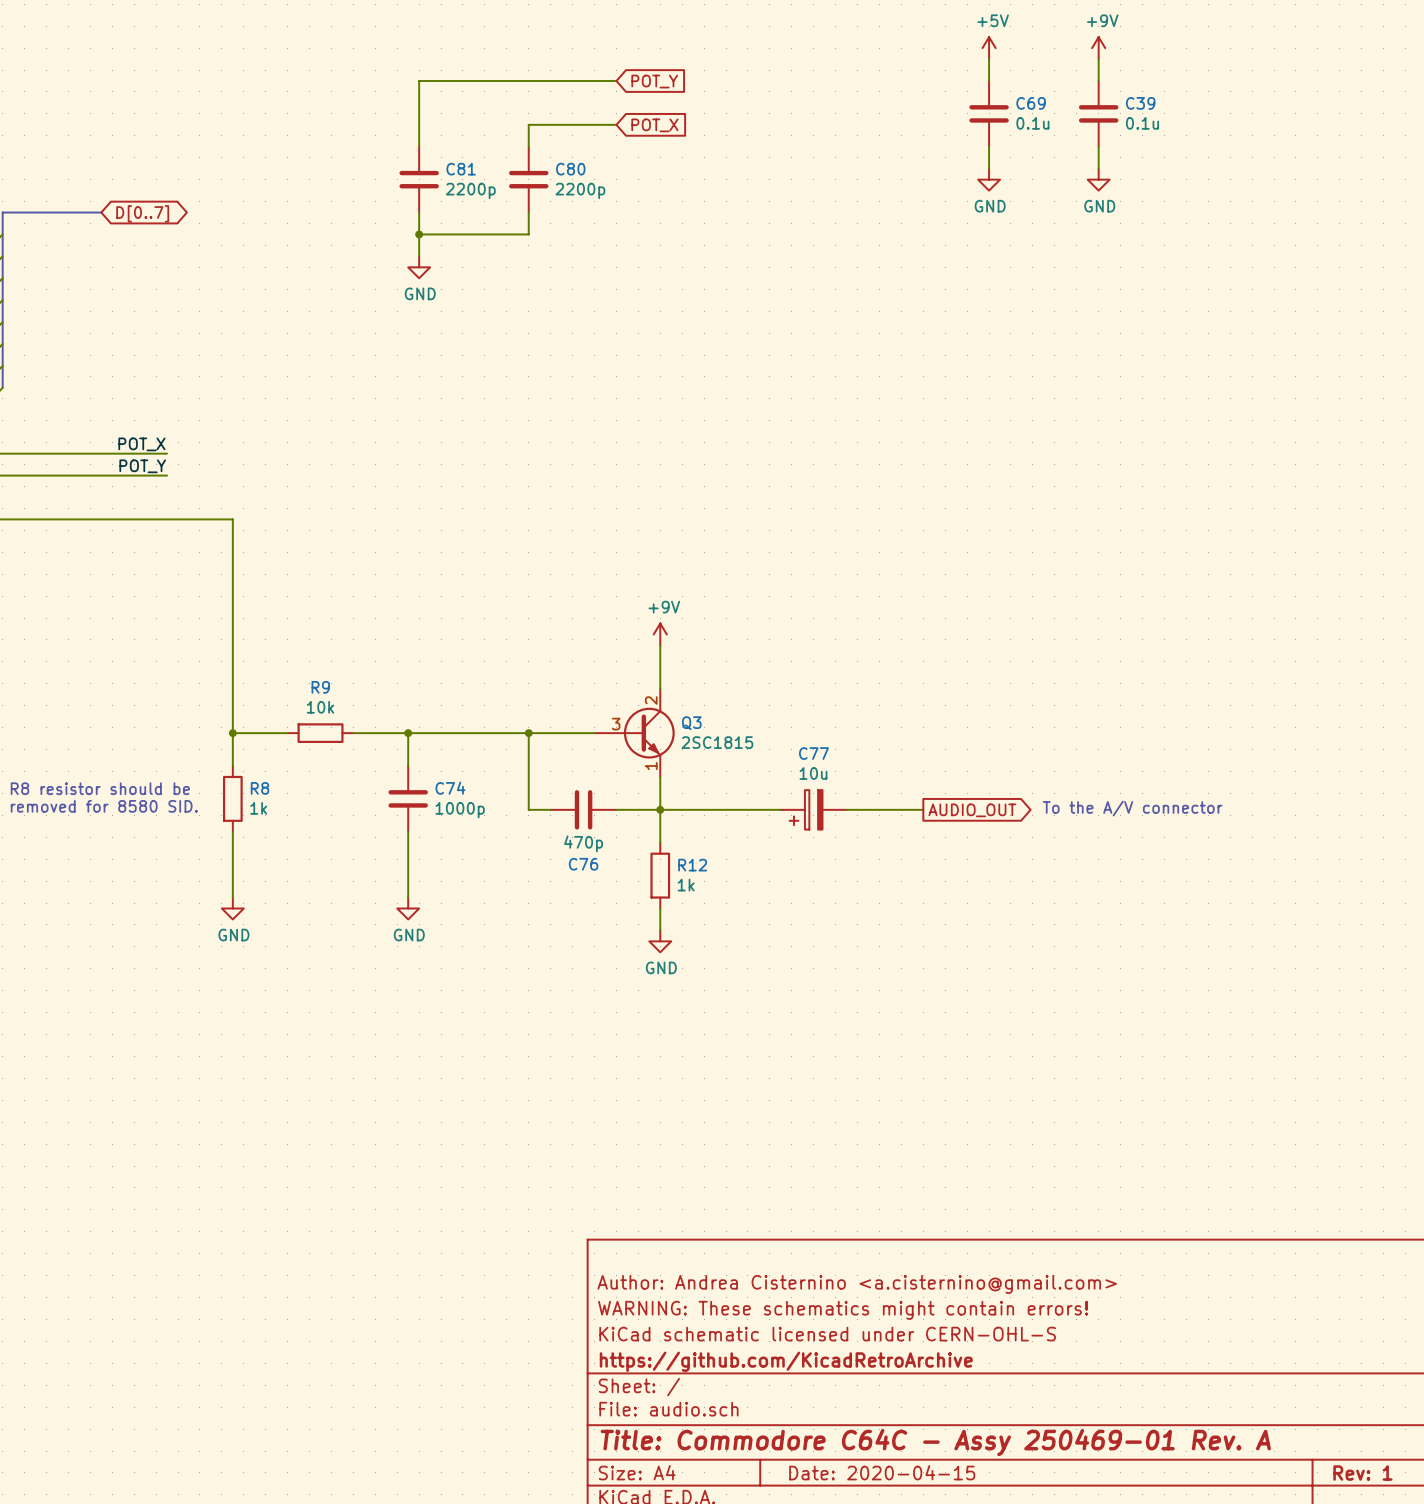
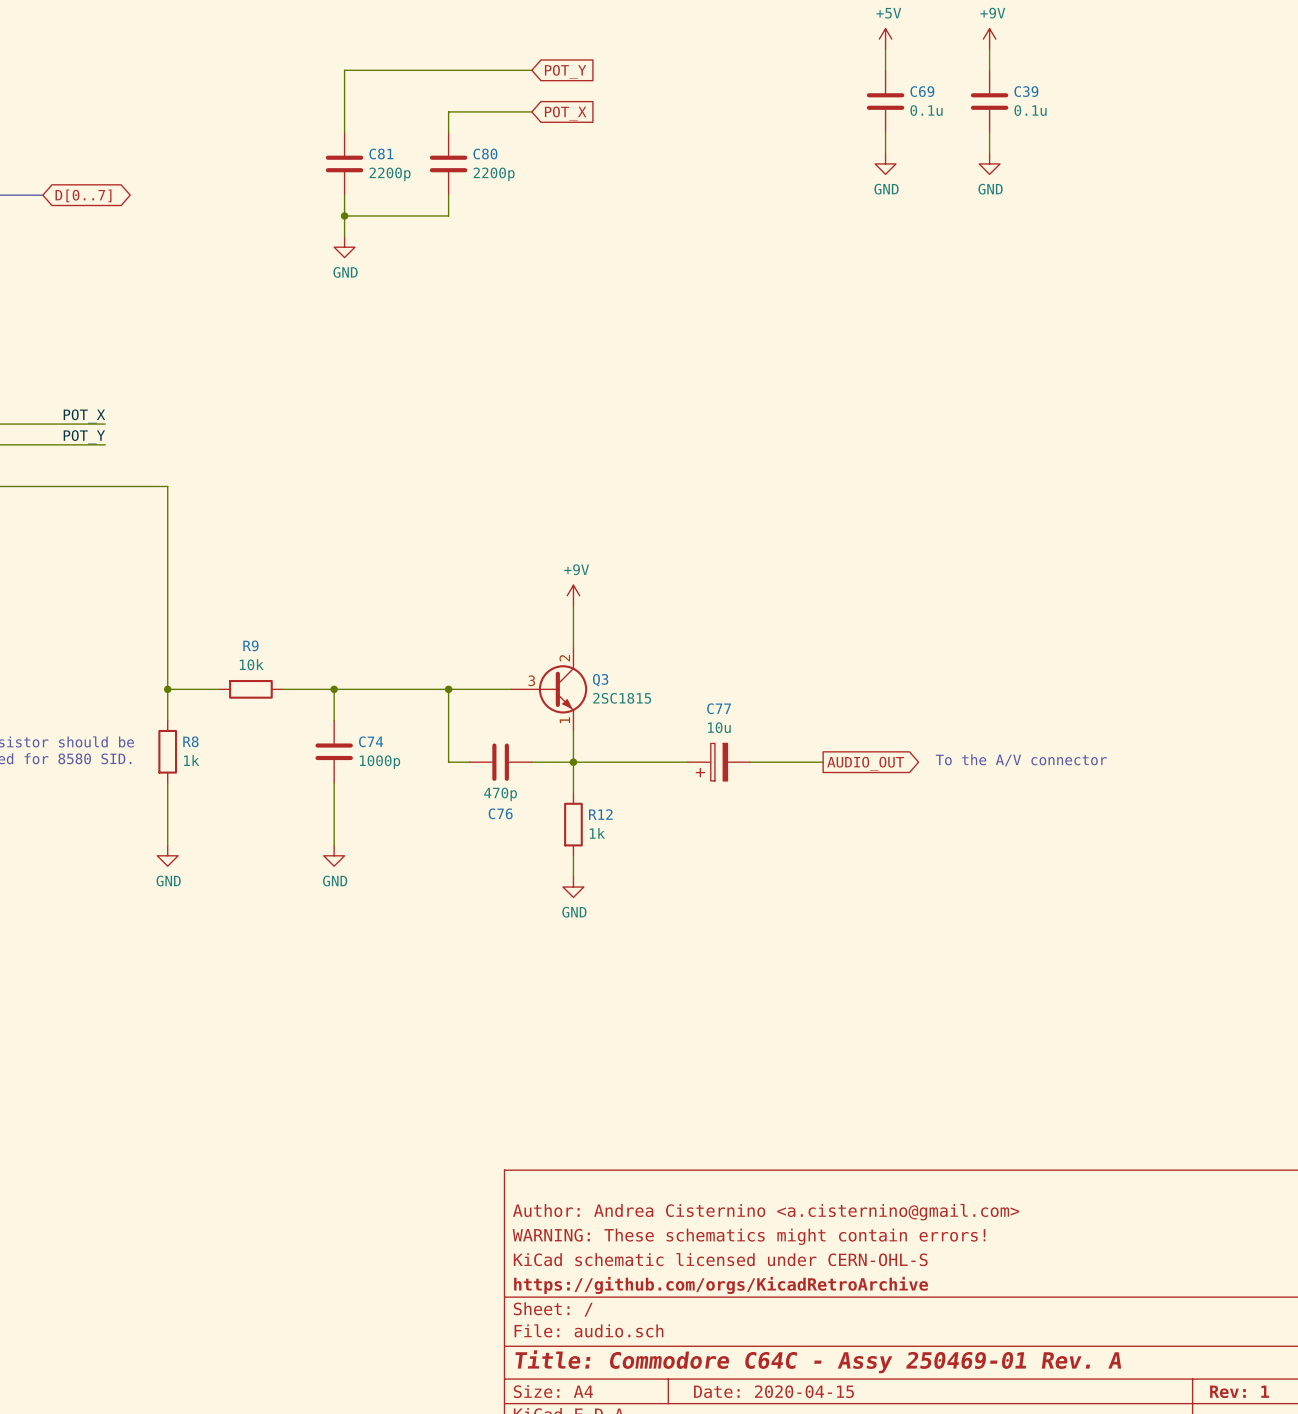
title block: https://github.com/KicadRetroArchive (786, 1361) -> https://github.com/orgs/KicadRetroArchive (721, 1285)

